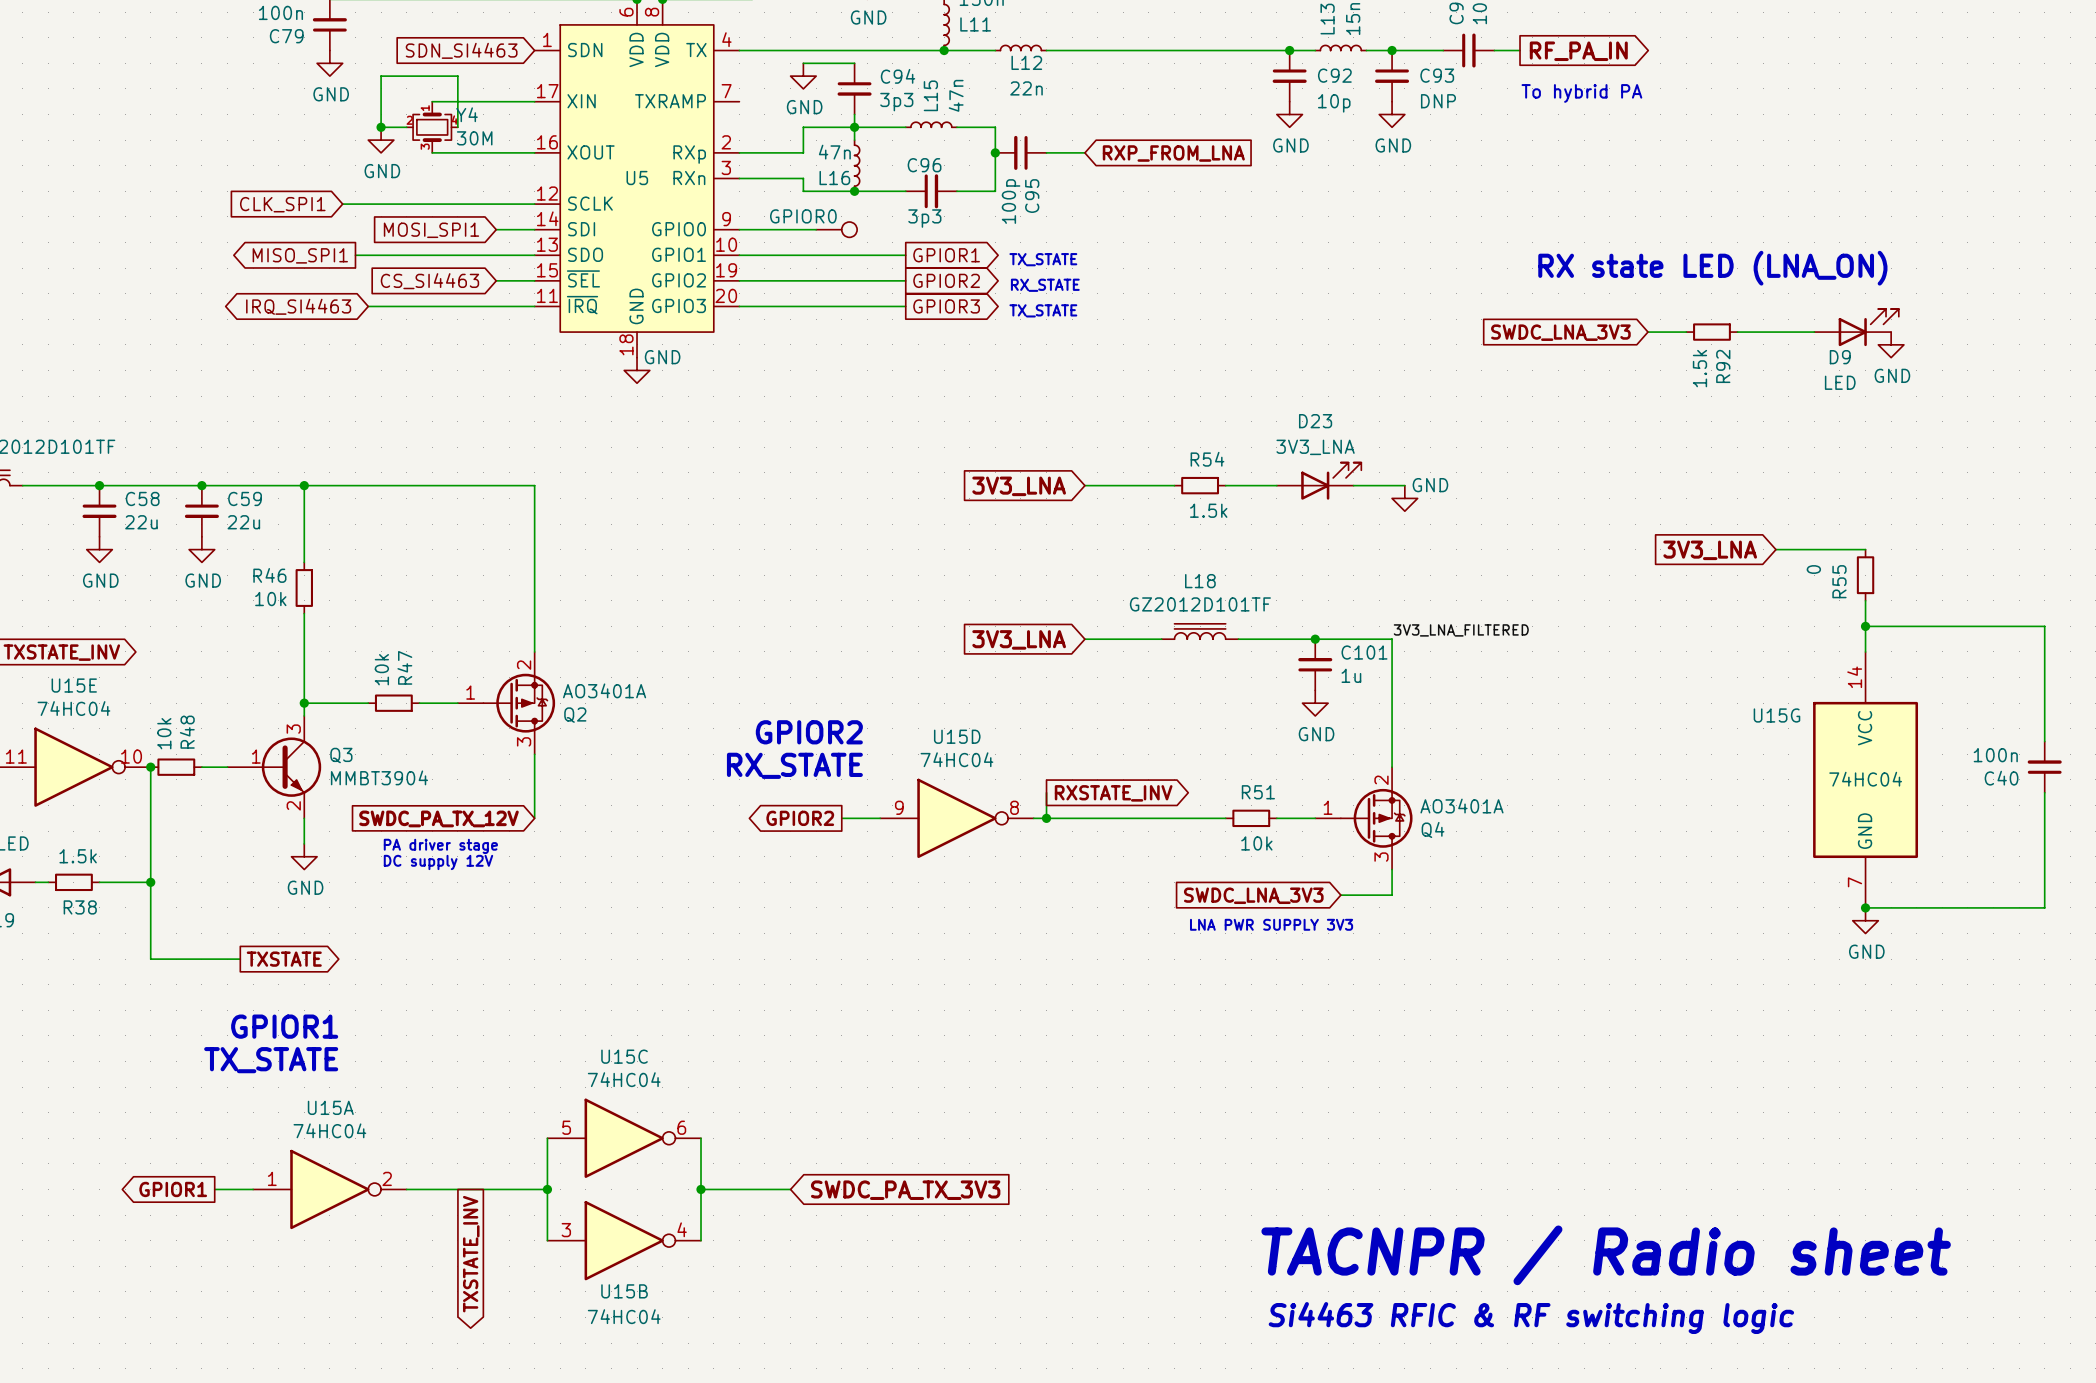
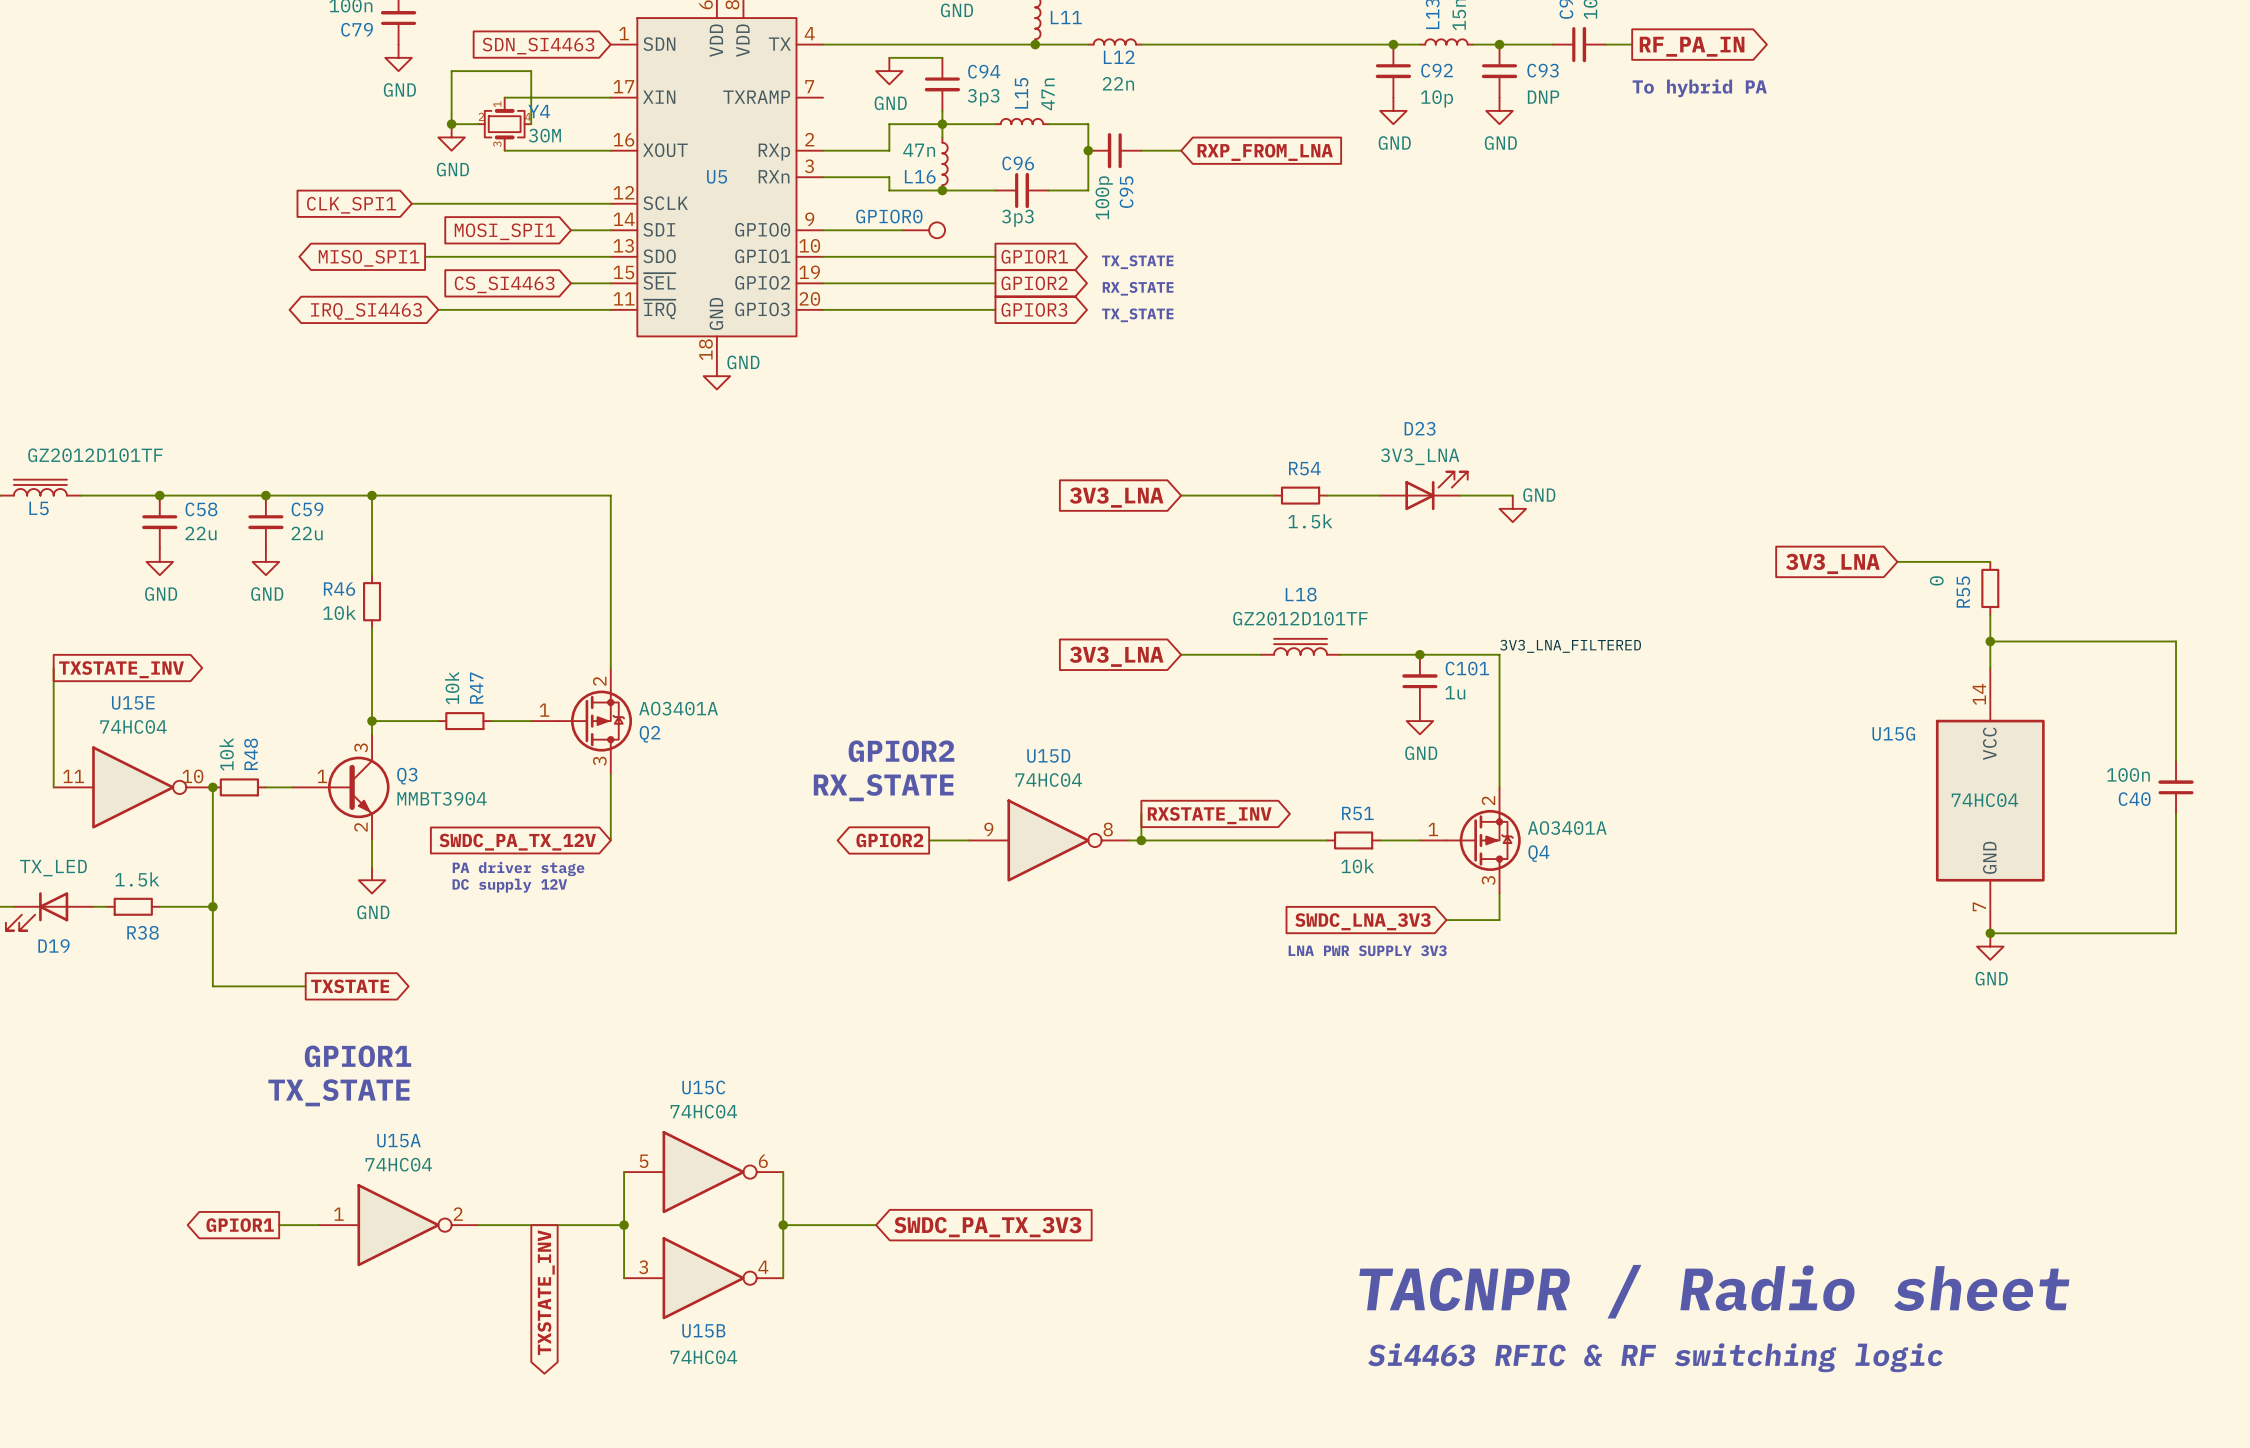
text: RX state LED (LNA_ON) (1712, 268) -> none
D9: LED (1856, 327) -> none
global label: SWDC_LNA_3V3 (1560, 332) -> none
wire: (1647, 332) (1686, 332) -> none
R92: 1.5k (1711, 332) -> none
wire: (1737, 332) (1814, 332) -> none
power symbol: GND (1891, 344) -> none

